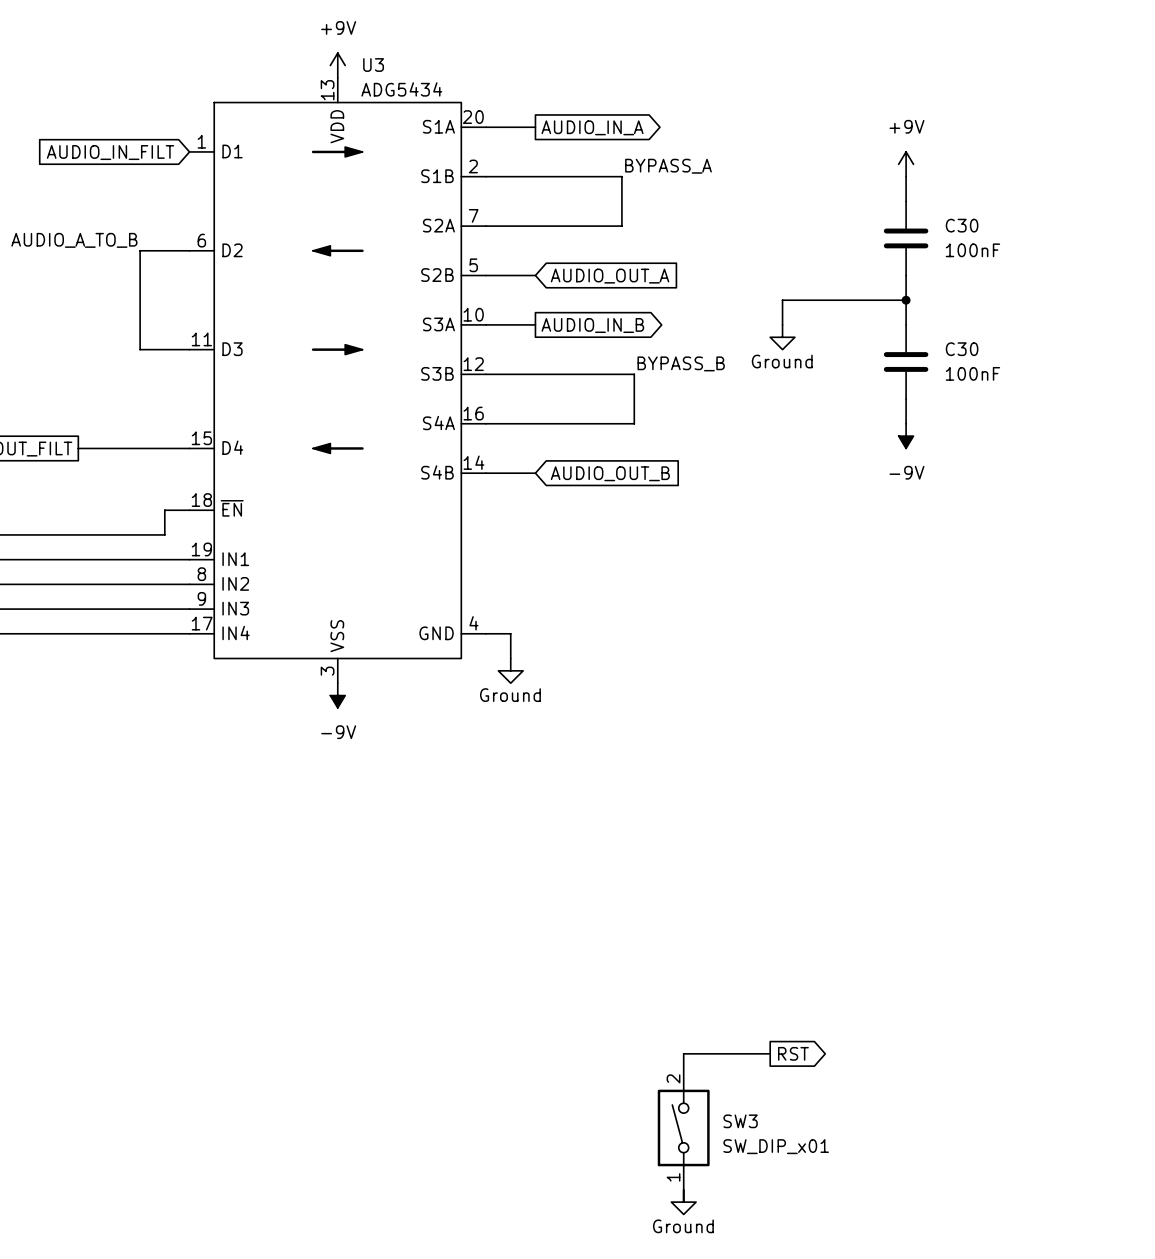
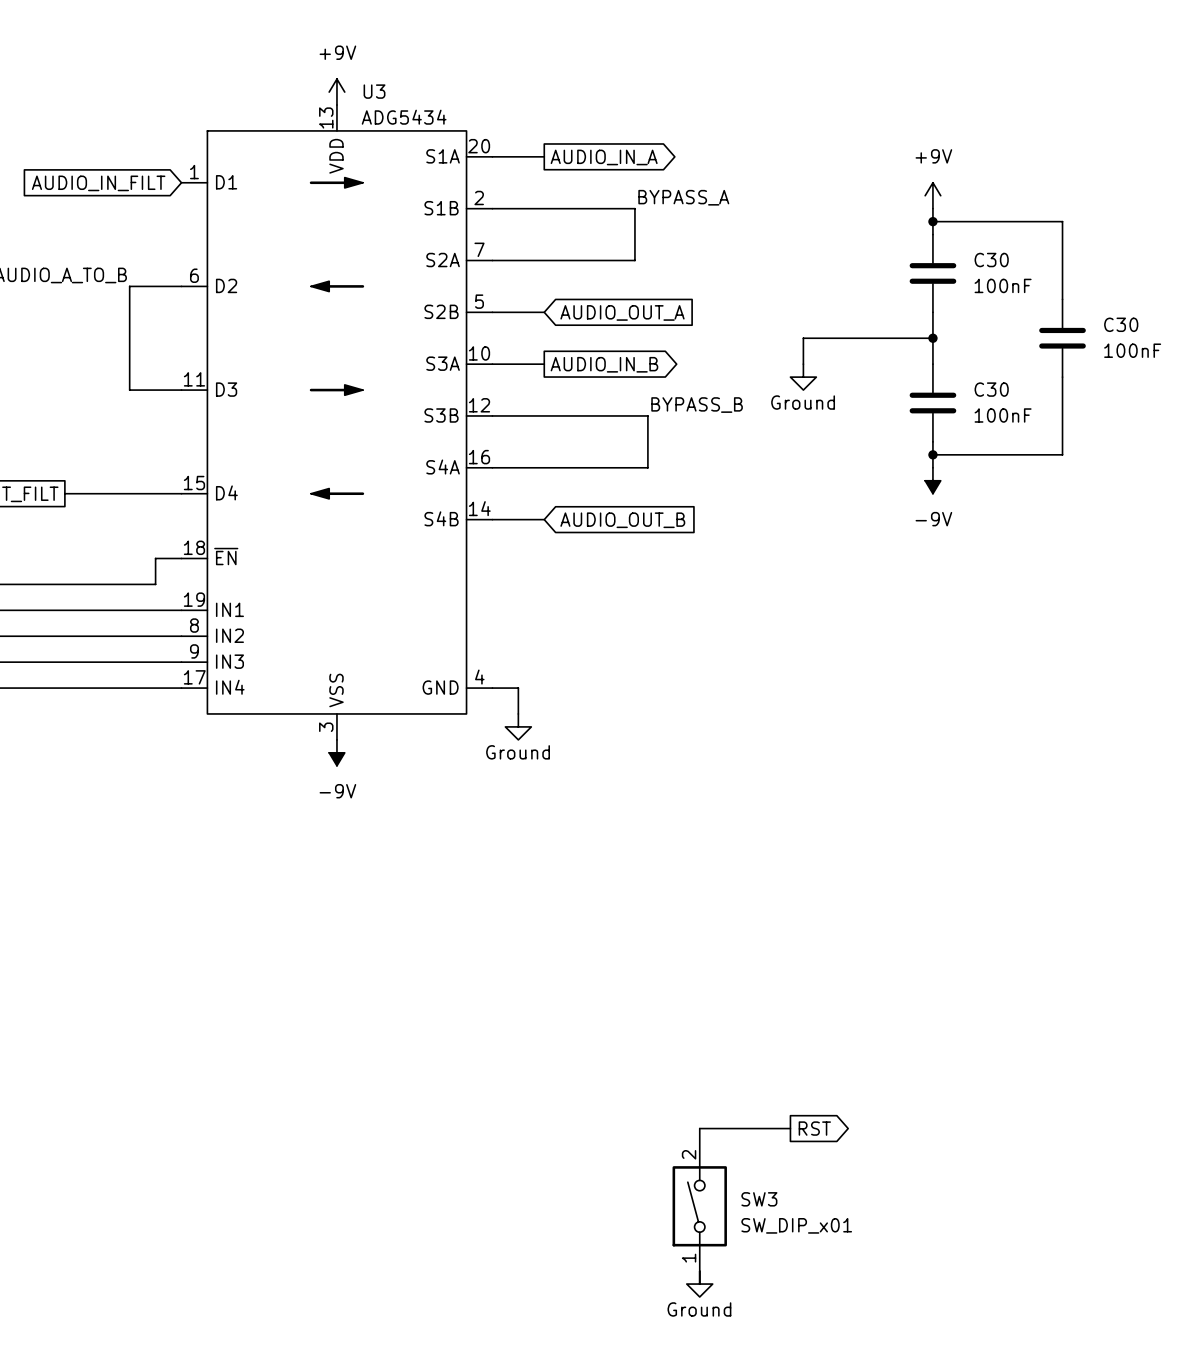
wire: none -> (932, 221) (1062, 221) (1062, 299)
junction: none -> (932, 221)
C30: none -> 100nF (1062, 338)
wire: none -> (1062, 377) (1062, 454) (932, 454)
junction: none -> (932, 454)

